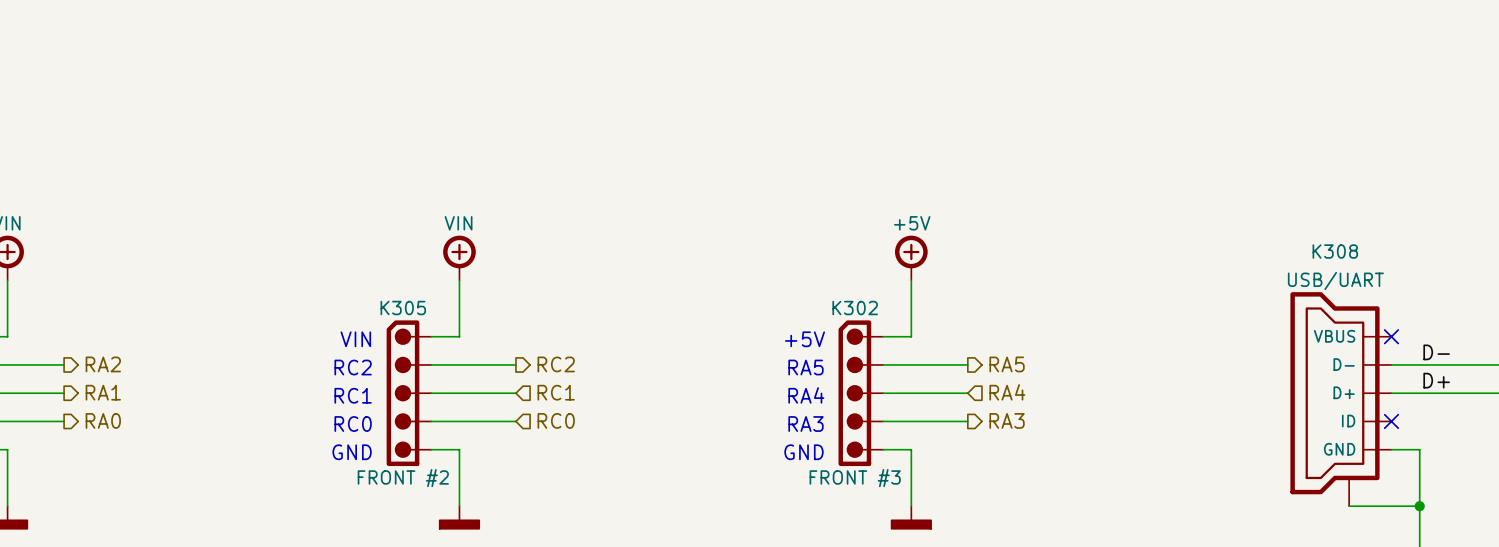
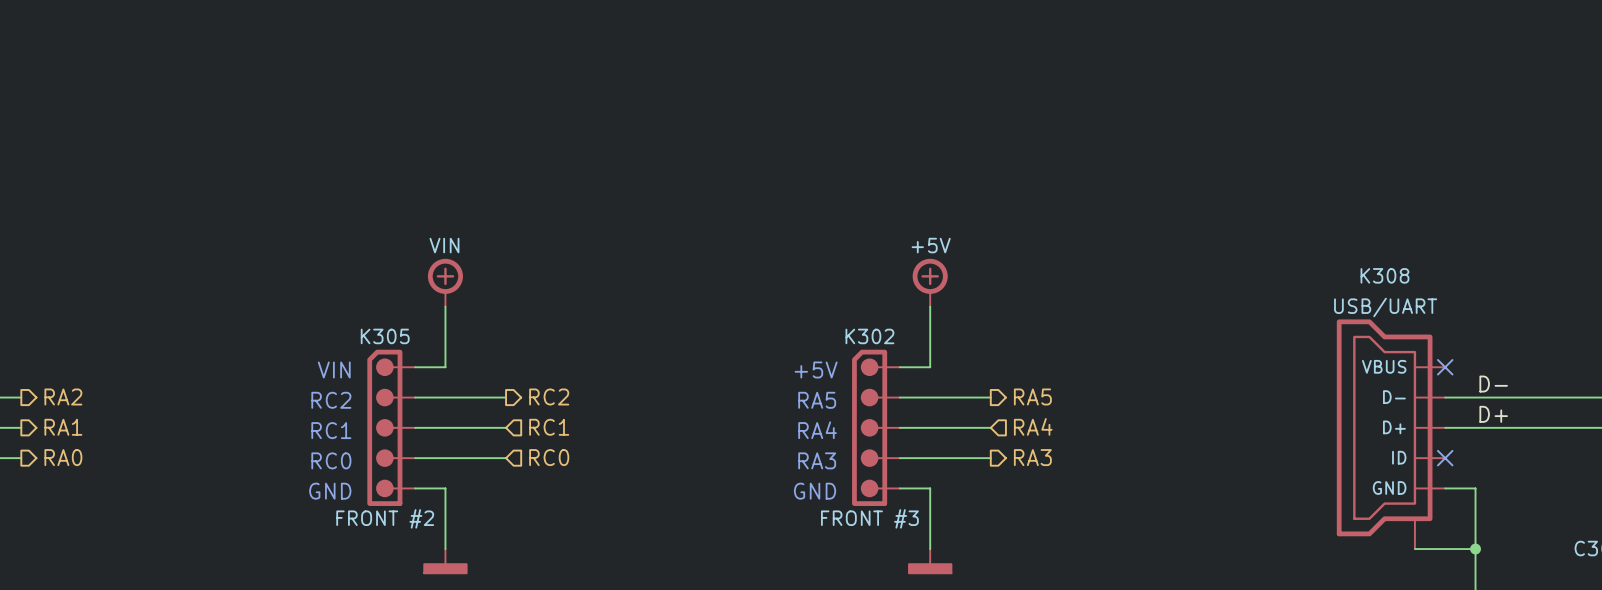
K308 symbol: [1290, 292, 1392, 507] -> [1336, 319, 1446, 550]
wire: (1349, 506) (1363, 506) -> none

